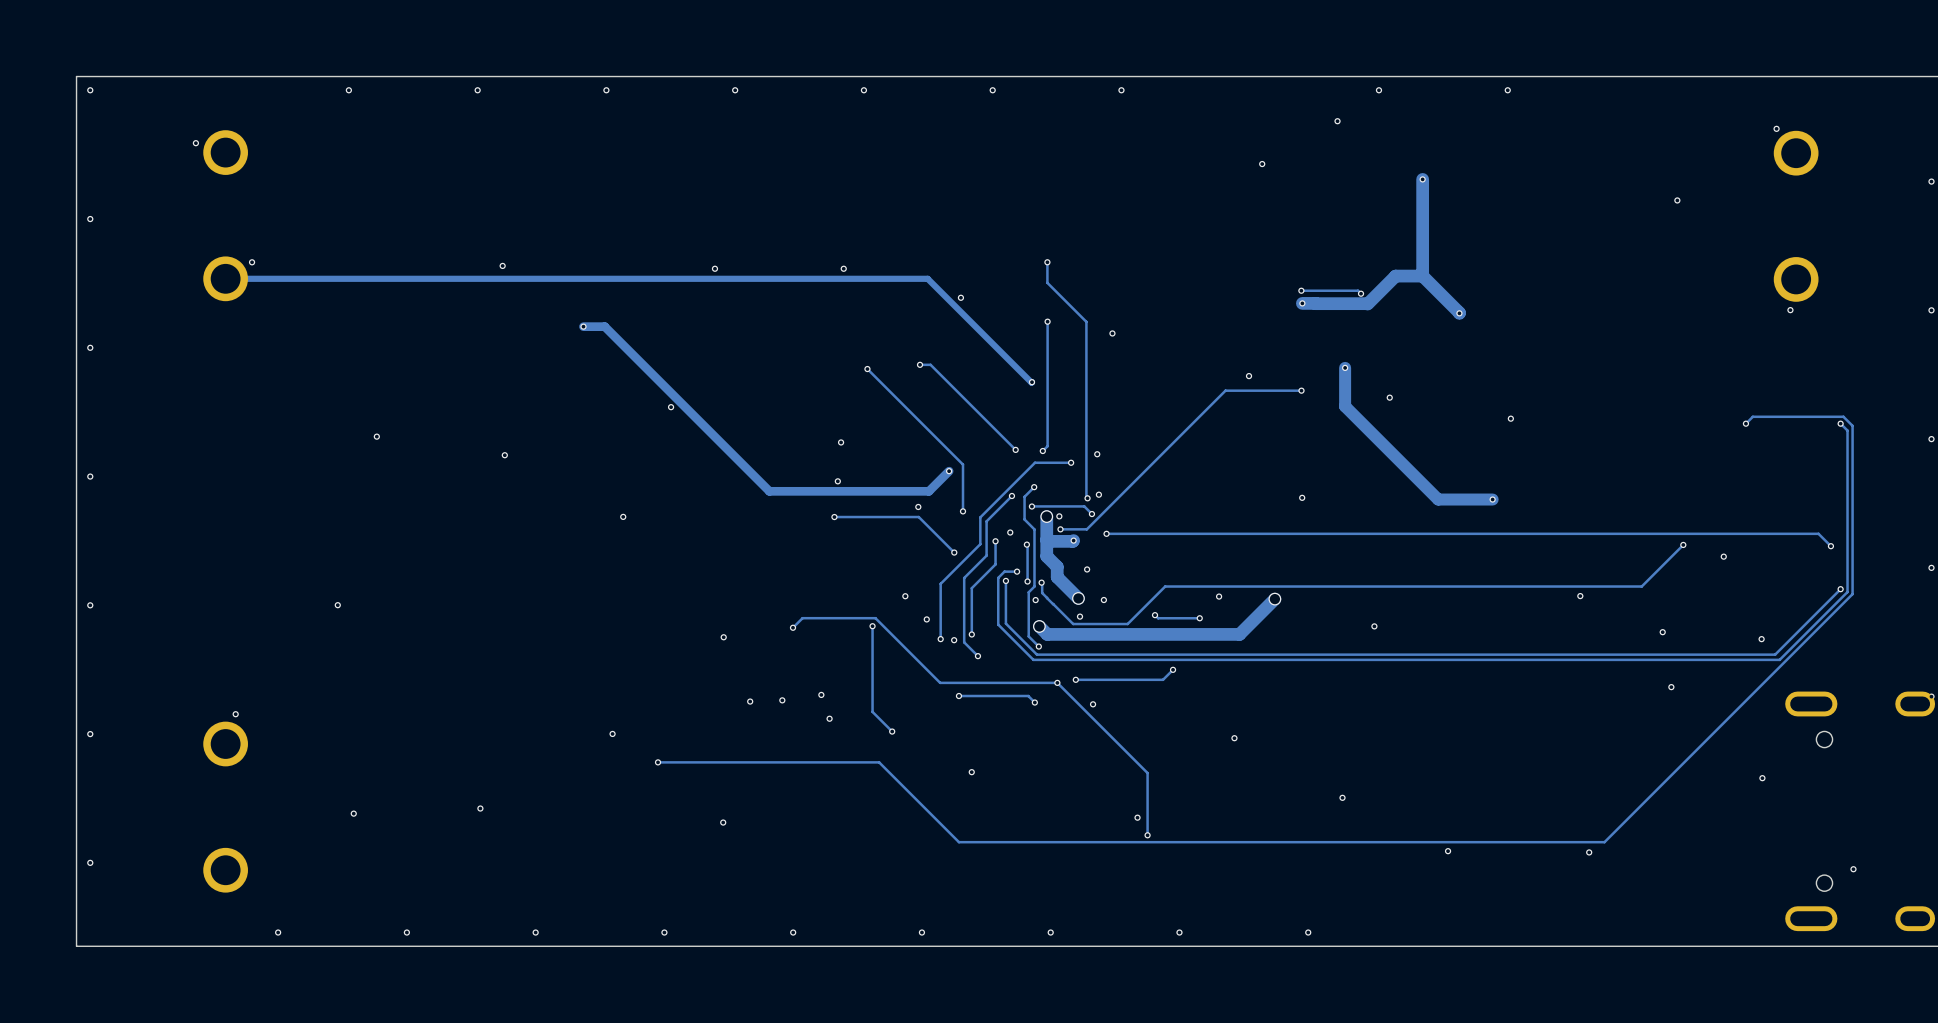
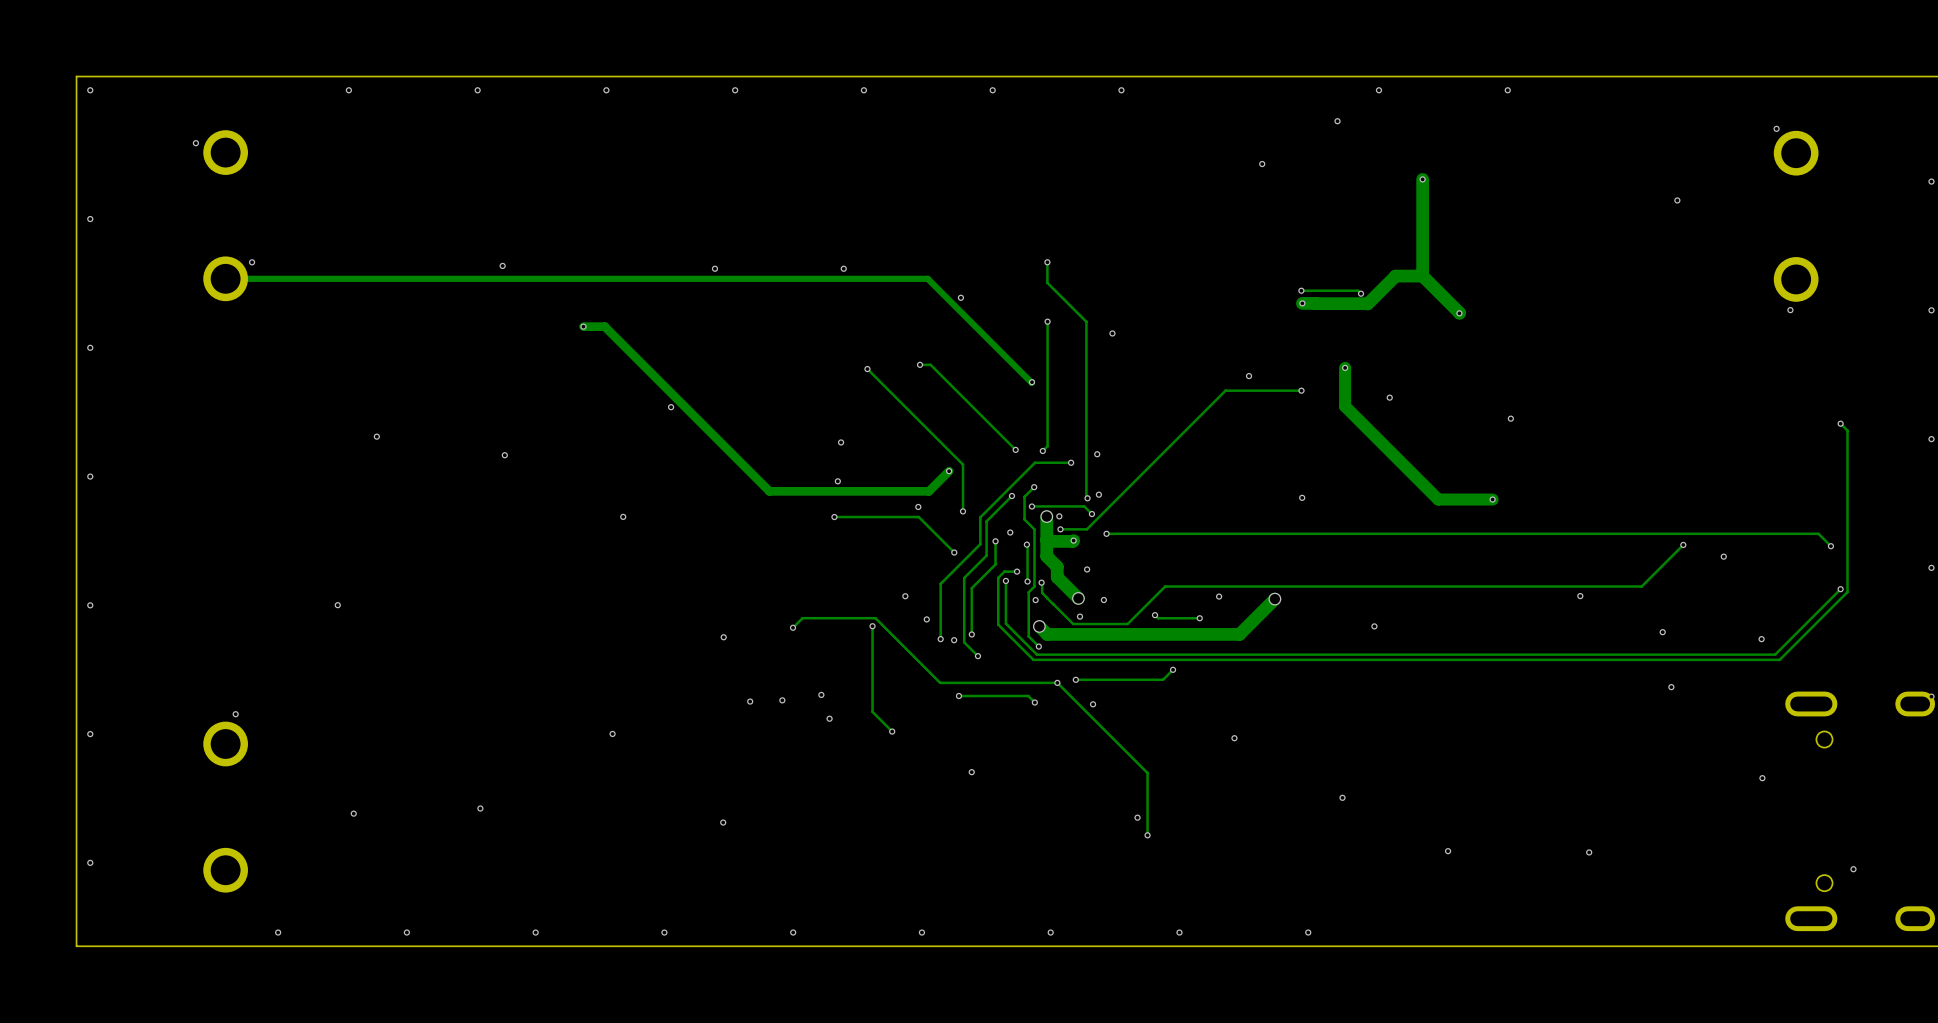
track: (1745, 423) (1752, 416) (1843, 416) (1852, 425) (1852, 594) (1604, 842) (958, 842) (879, 762) (658, 762) -> none
via: (1745, 423) -> none
via: (658, 762) -> none

